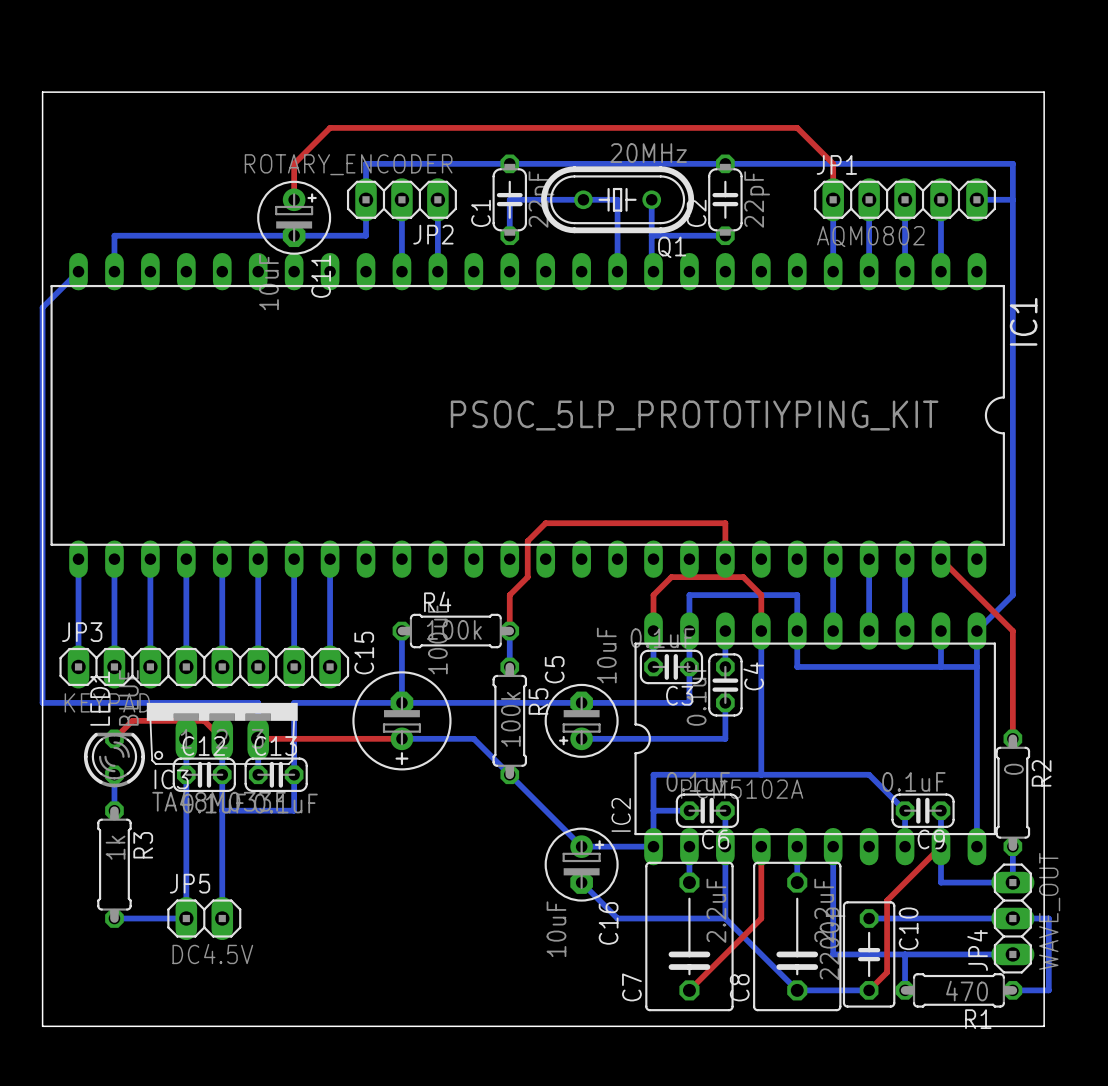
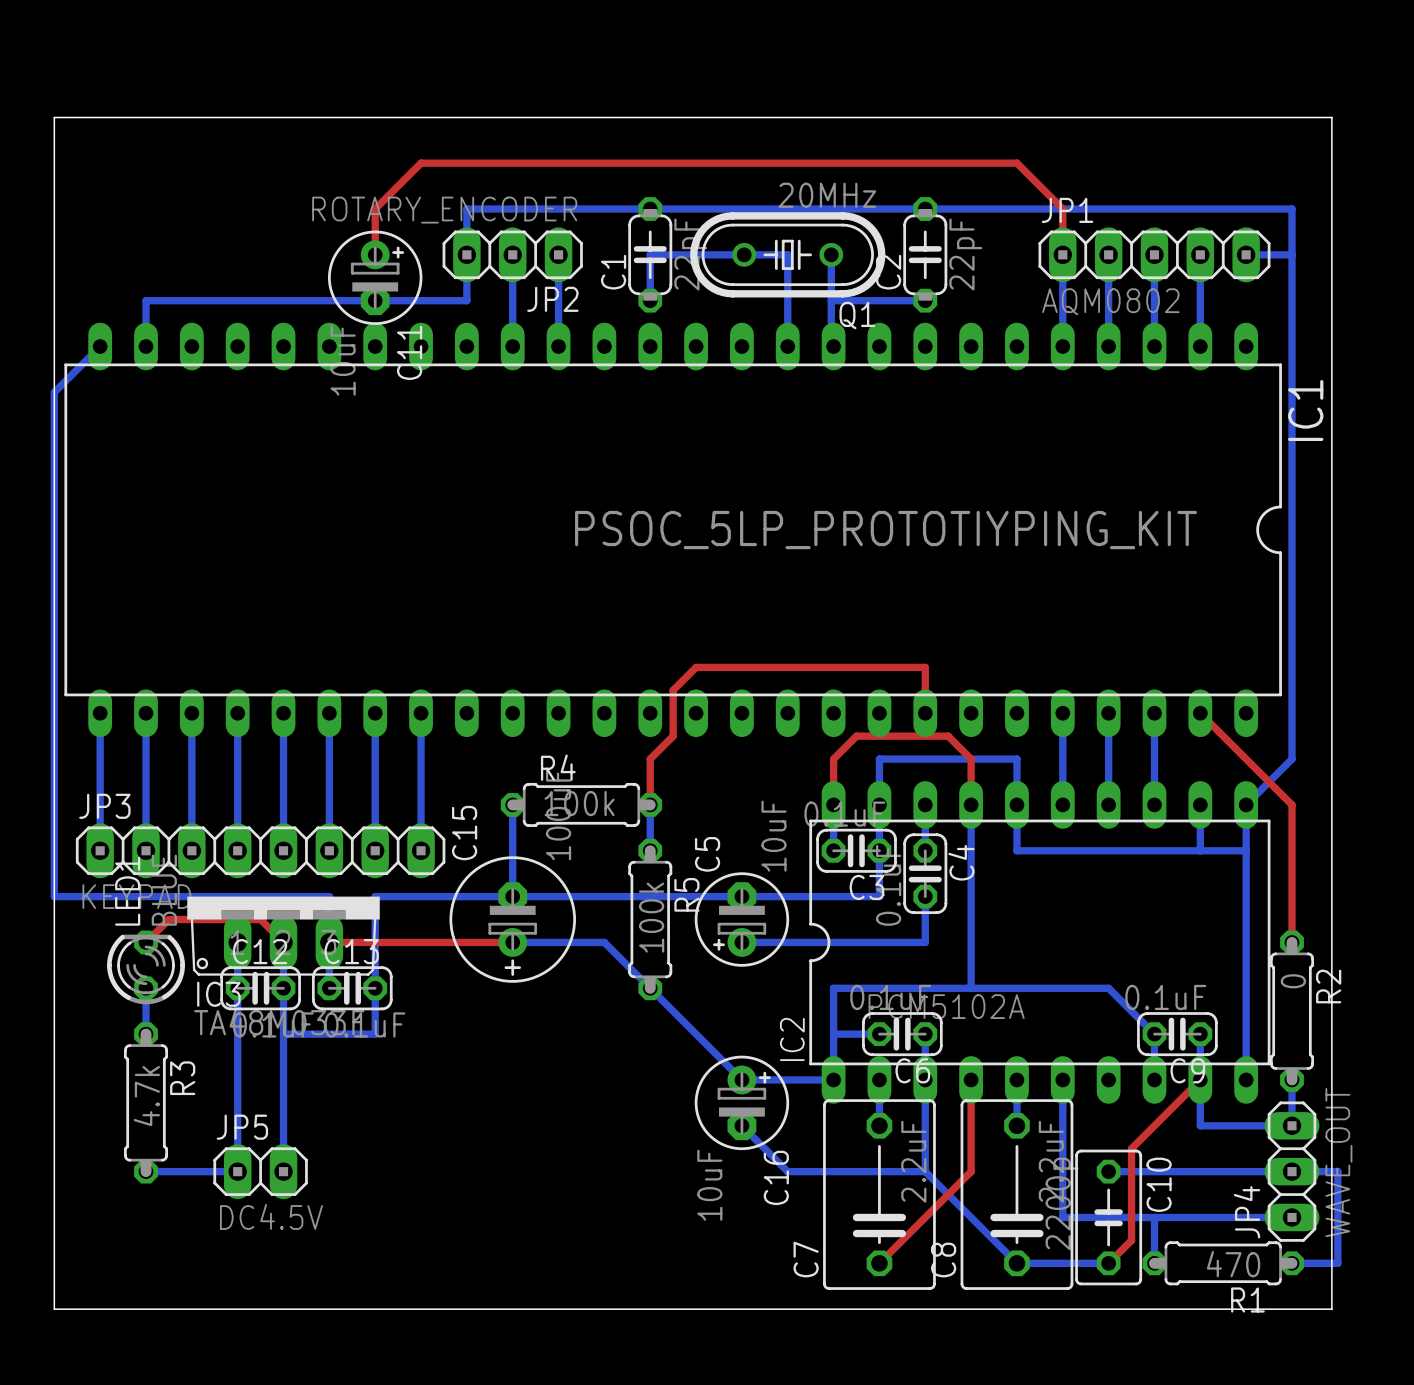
R3 value: 1k (115, 847) -> 4.7k (146, 1096)

